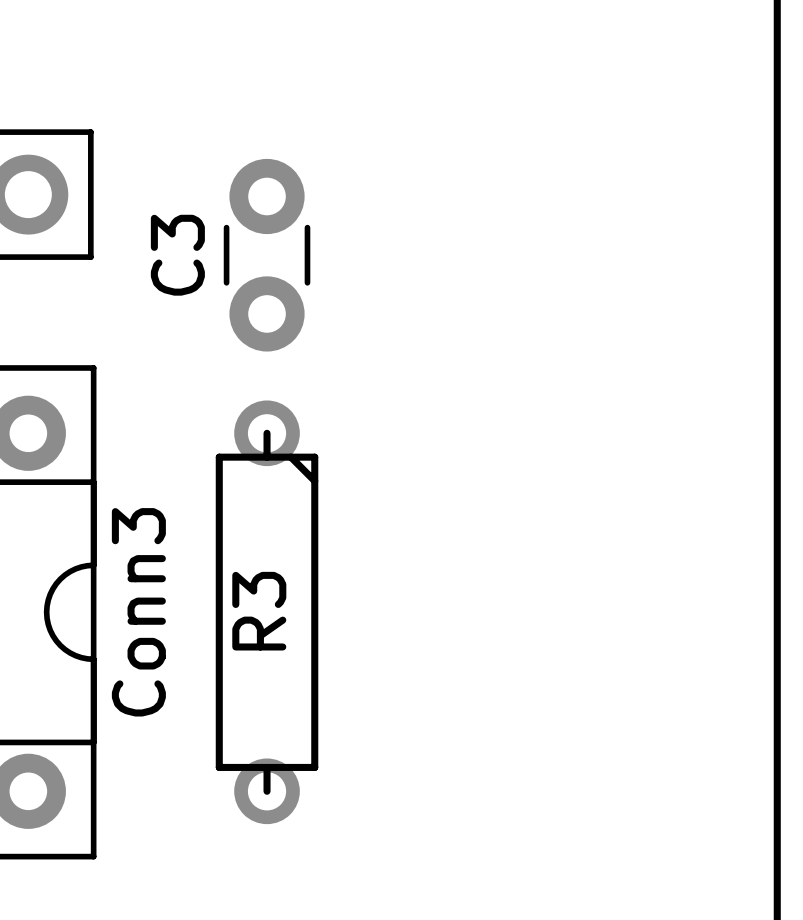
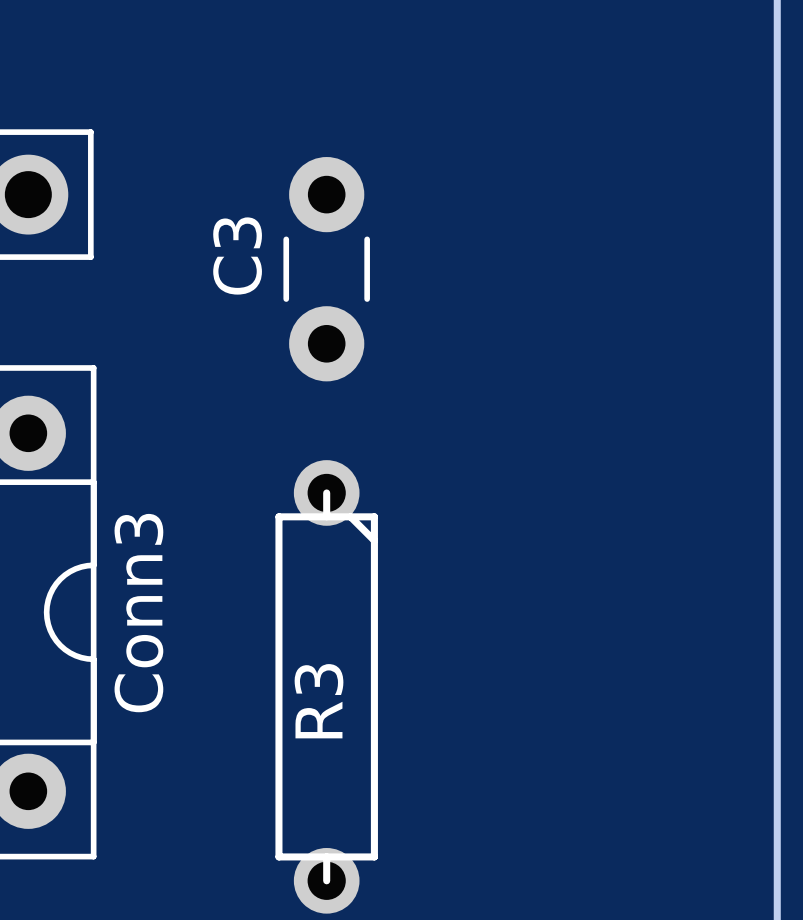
C3 footprint: [223, 158, 311, 352] -> [283, 157, 370, 382]
R3 footprint: [215, 400, 319, 825] -> [275, 460, 378, 914]

